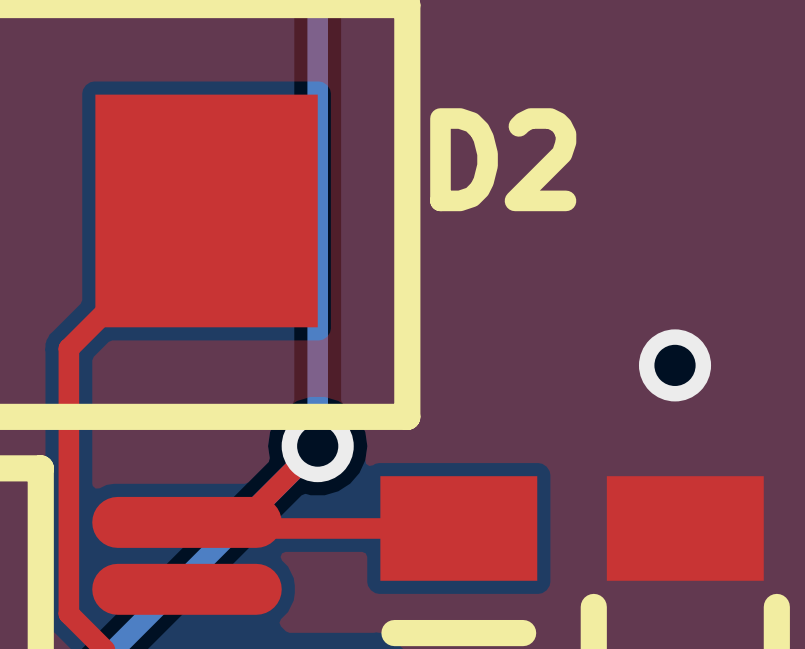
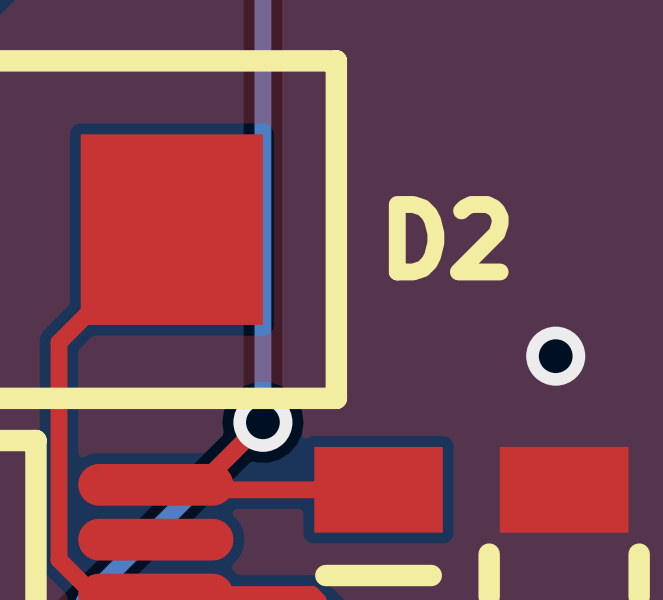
D2 name position: D2 (503, 159) -> D2 (448, 238)

